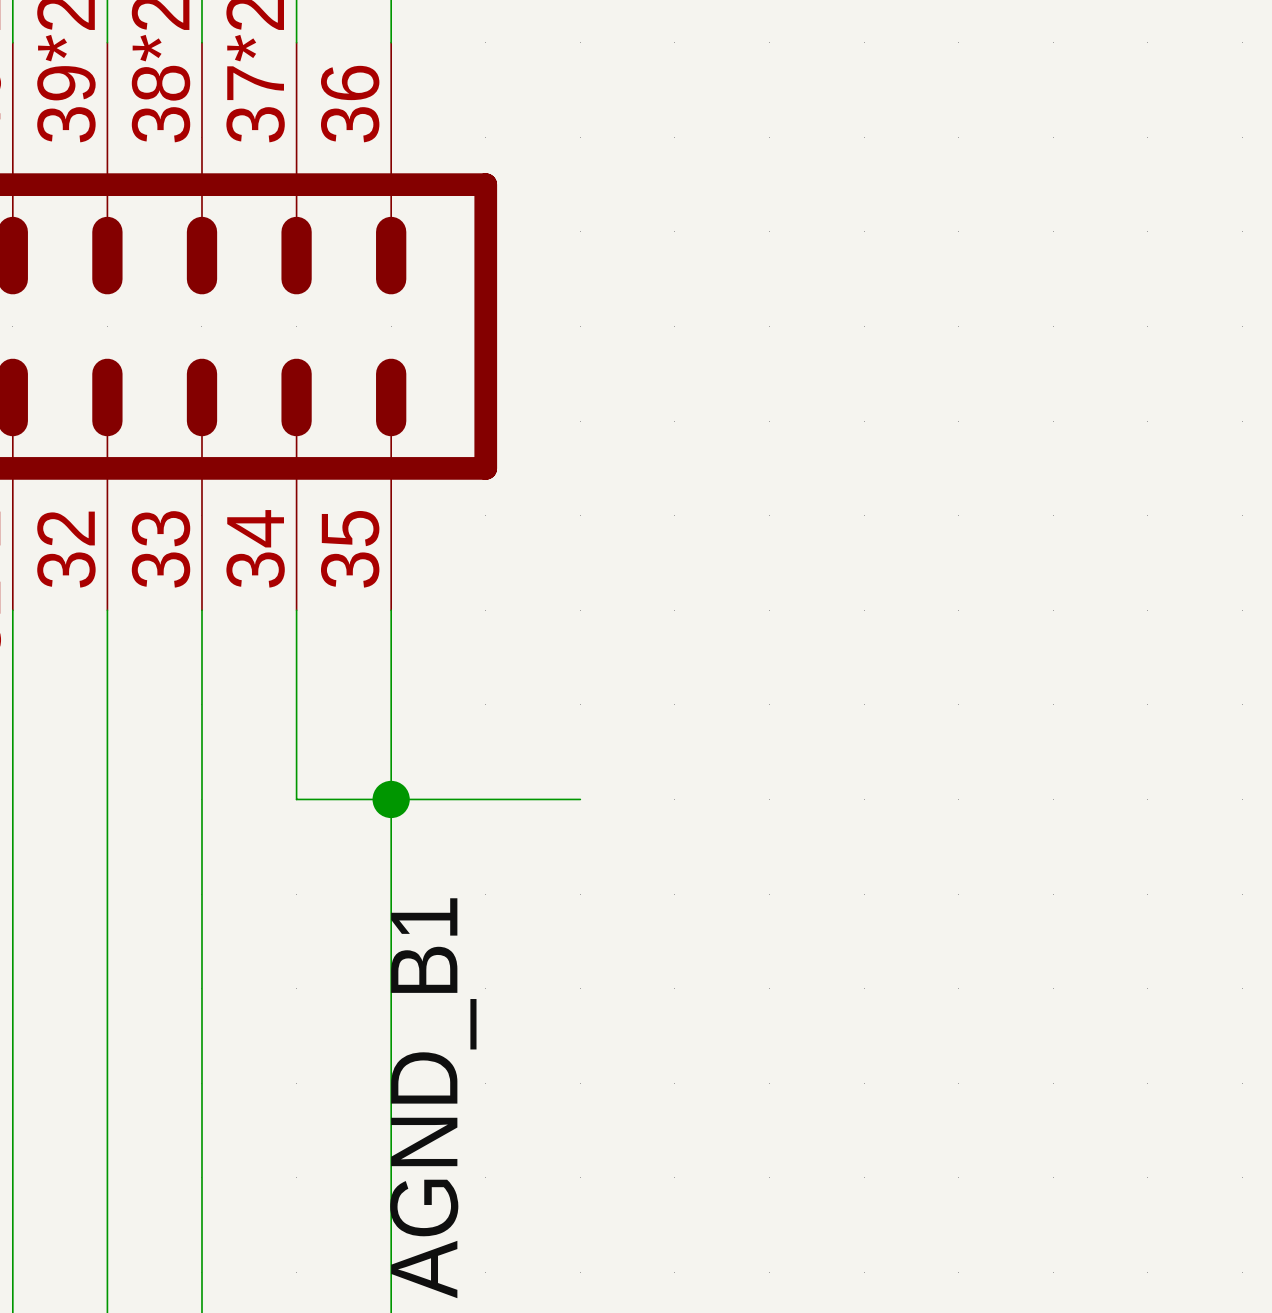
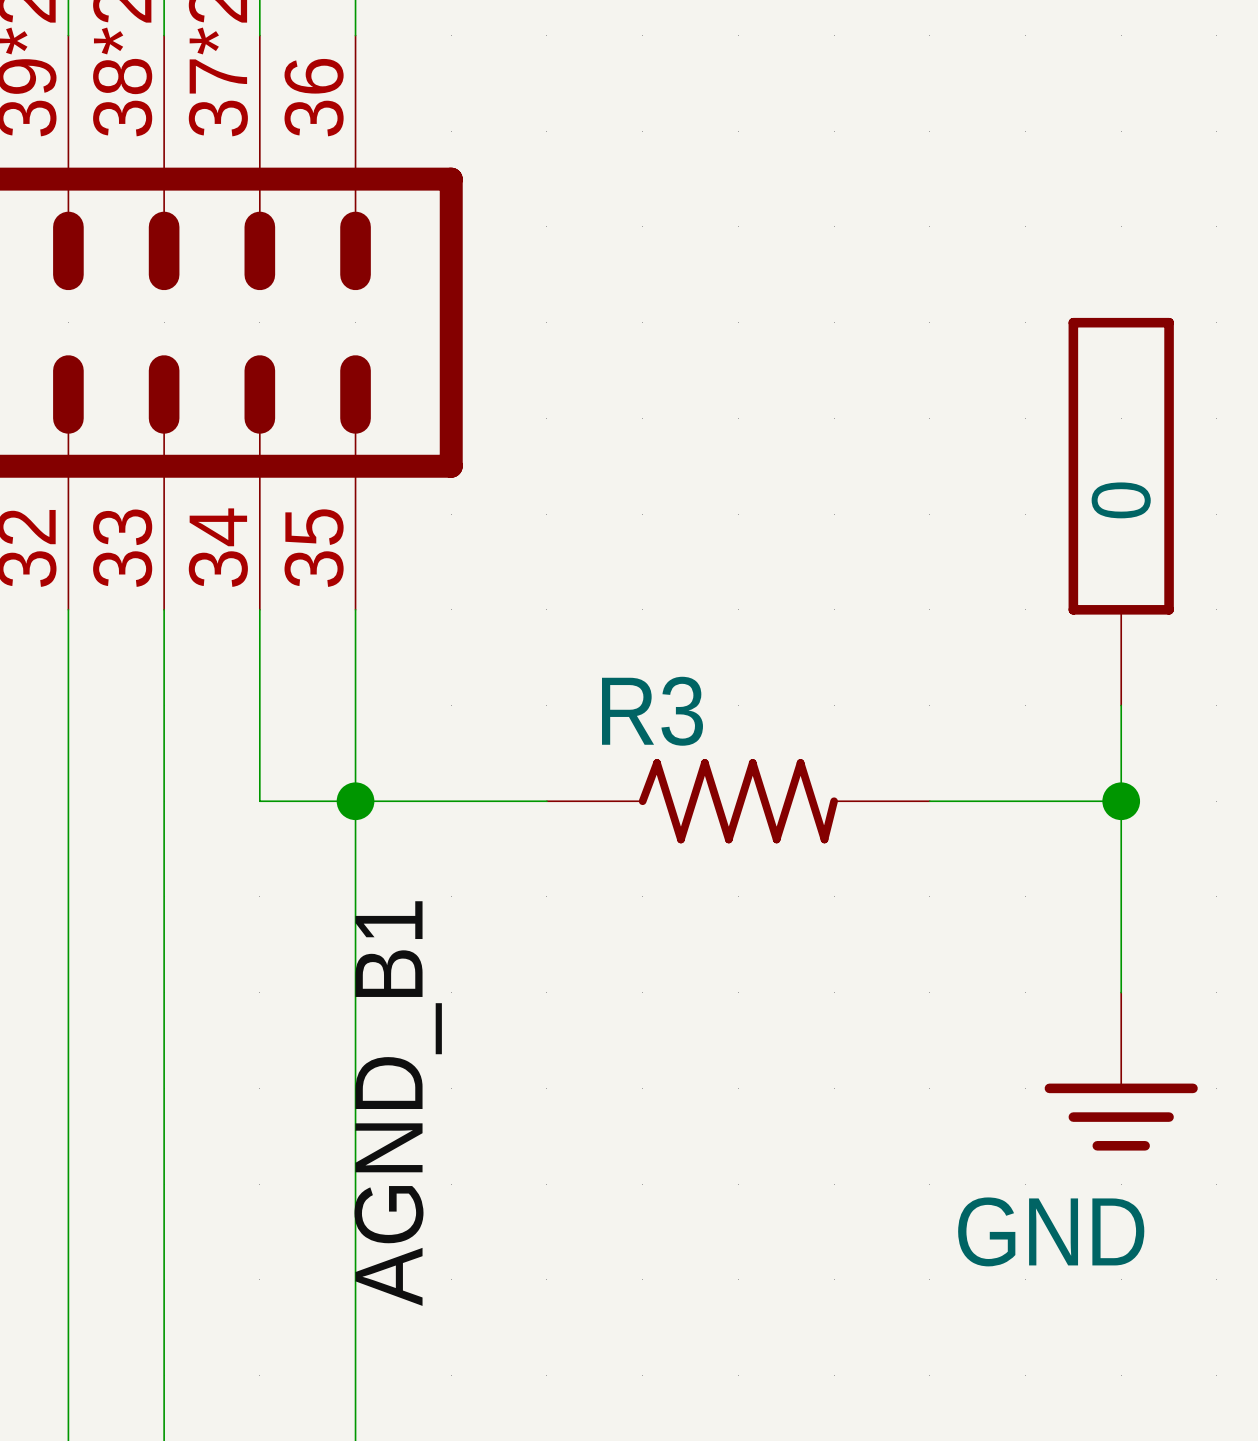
part: none -> (1121, 511)
wire: none -> (1121, 705) (1121, 992)
R3: none -> (738, 801)
wire: none -> (929, 801) (1121, 801)
junction: none -> (1121, 801)
power symbol: none -> GND (1121, 1071)

